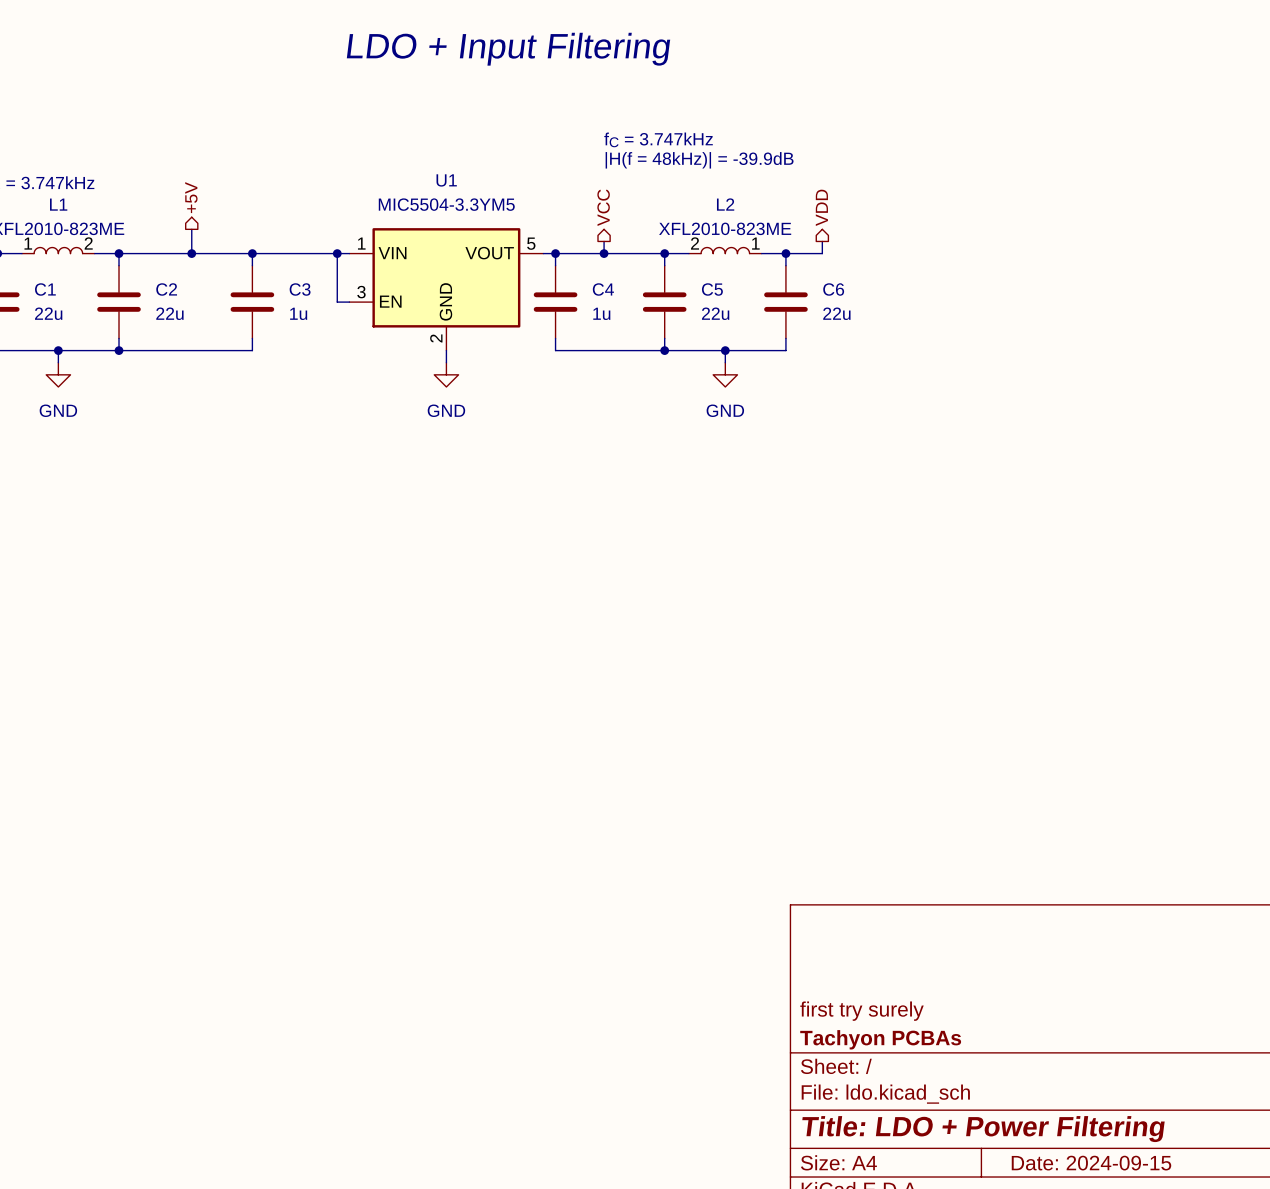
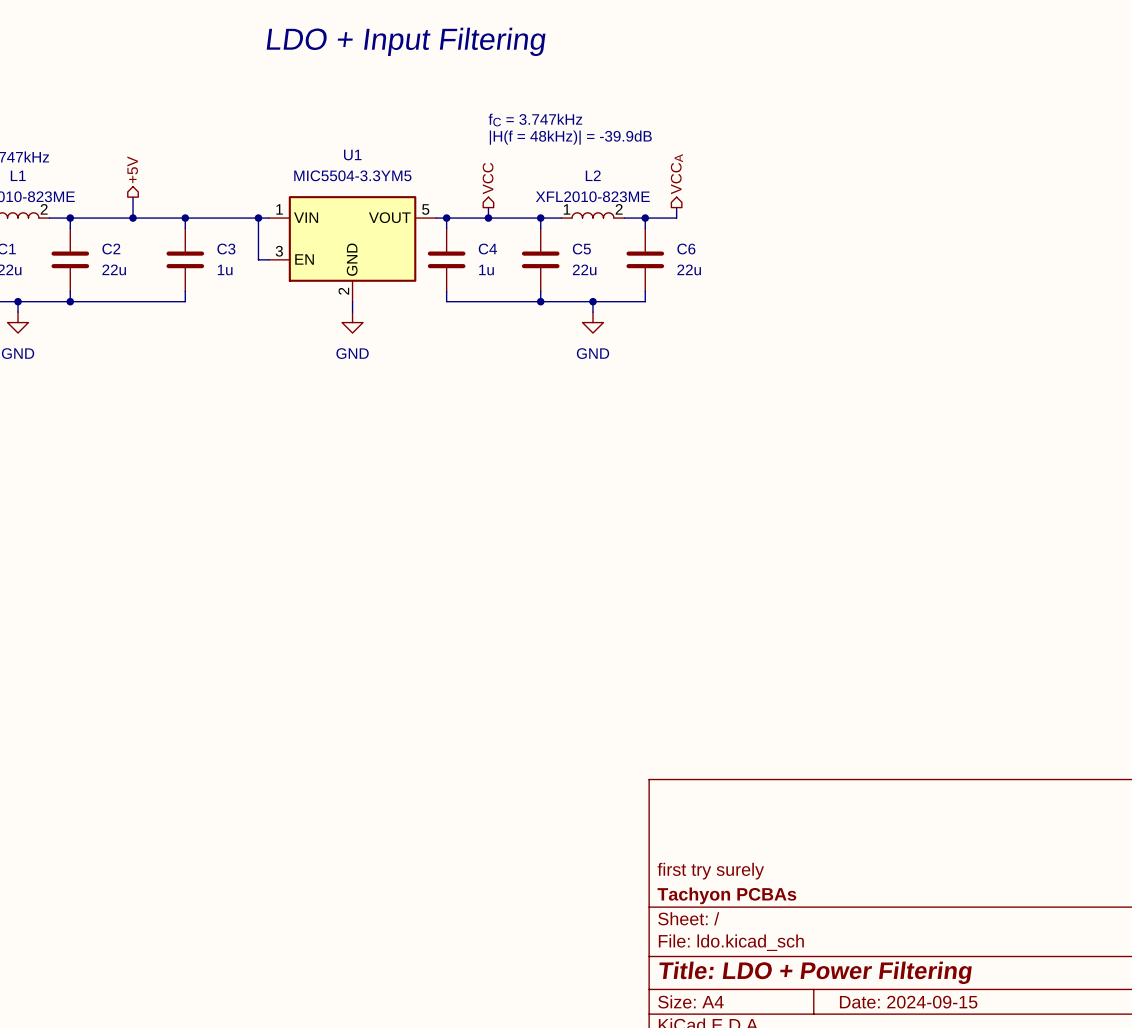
hierarchical label: VDD (821, 207) -> VCCA (676, 174)
L2 flip: as is (725, 250) -> left-right (592, 215)

